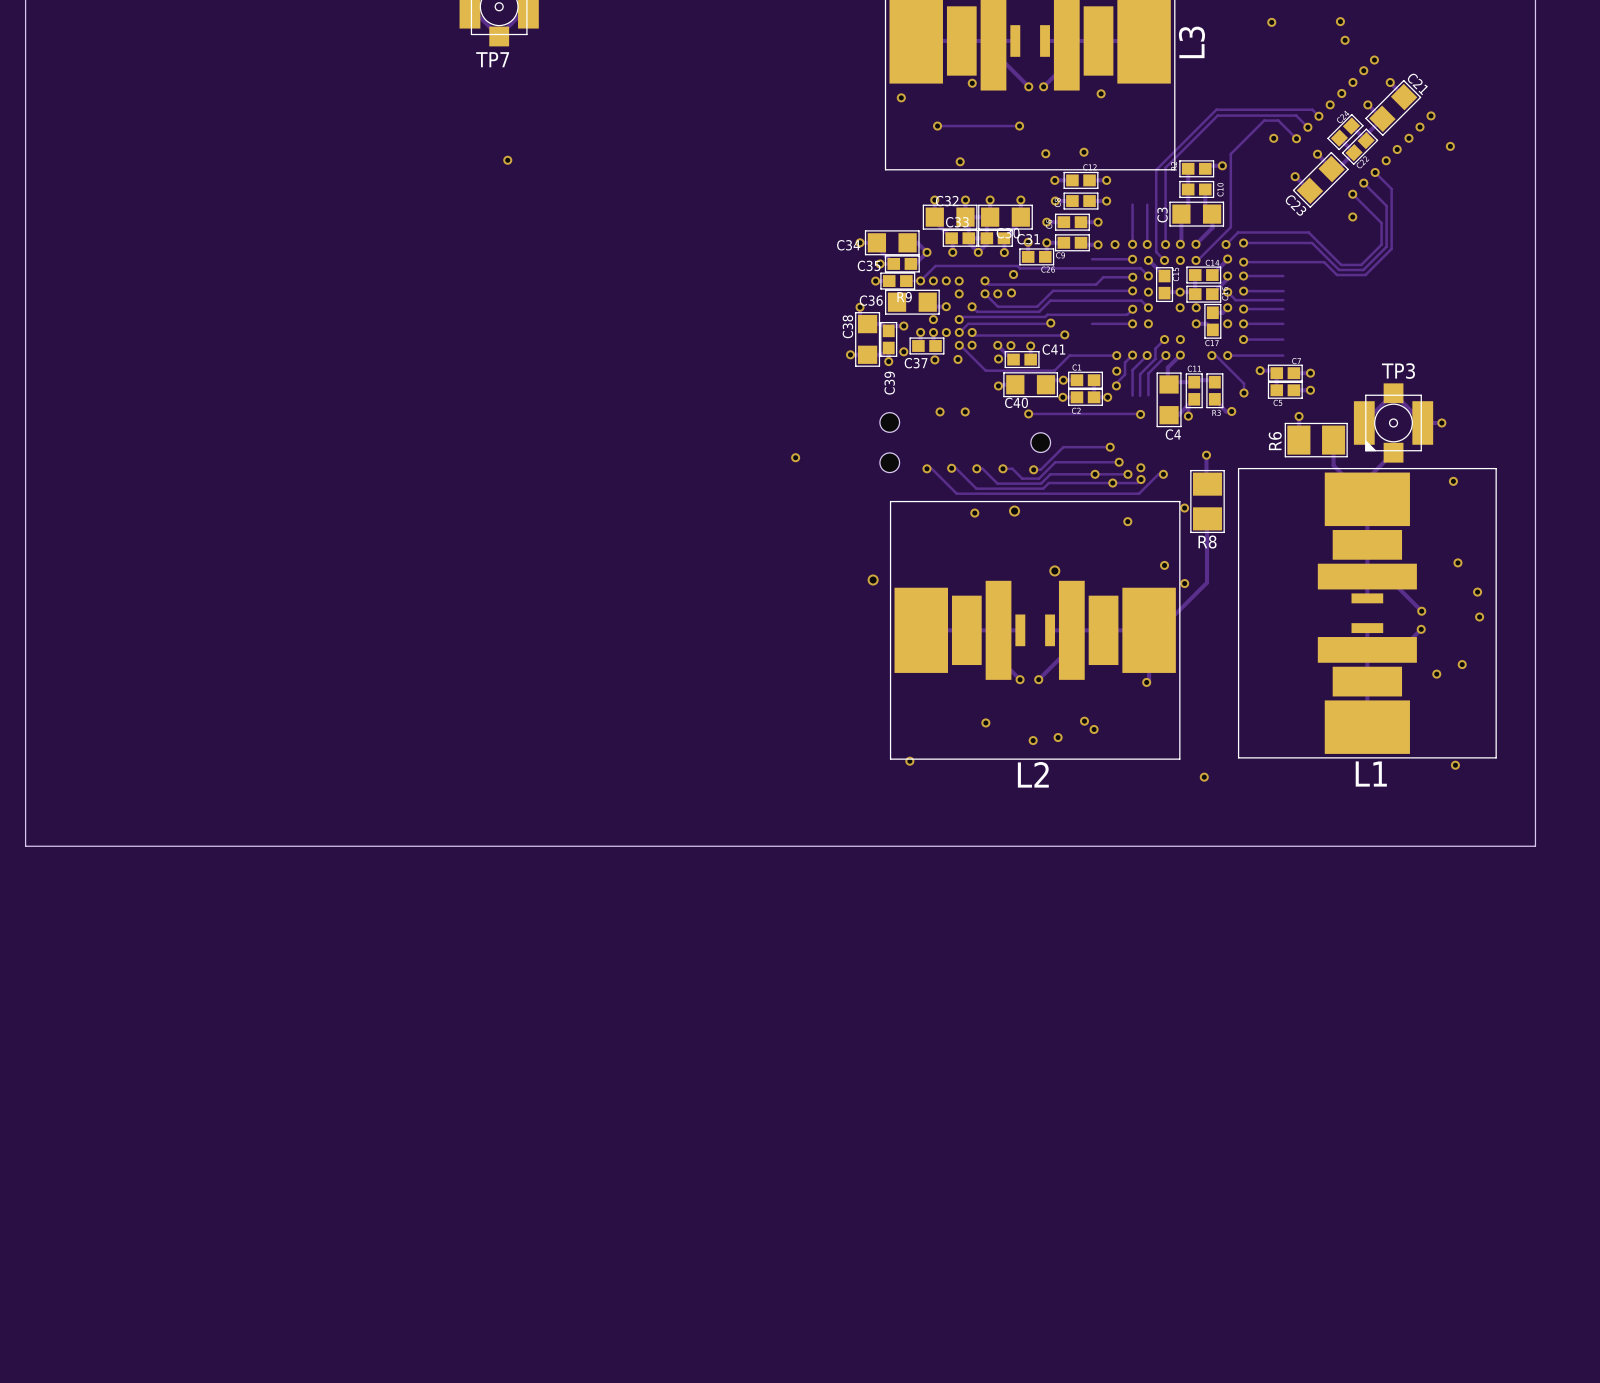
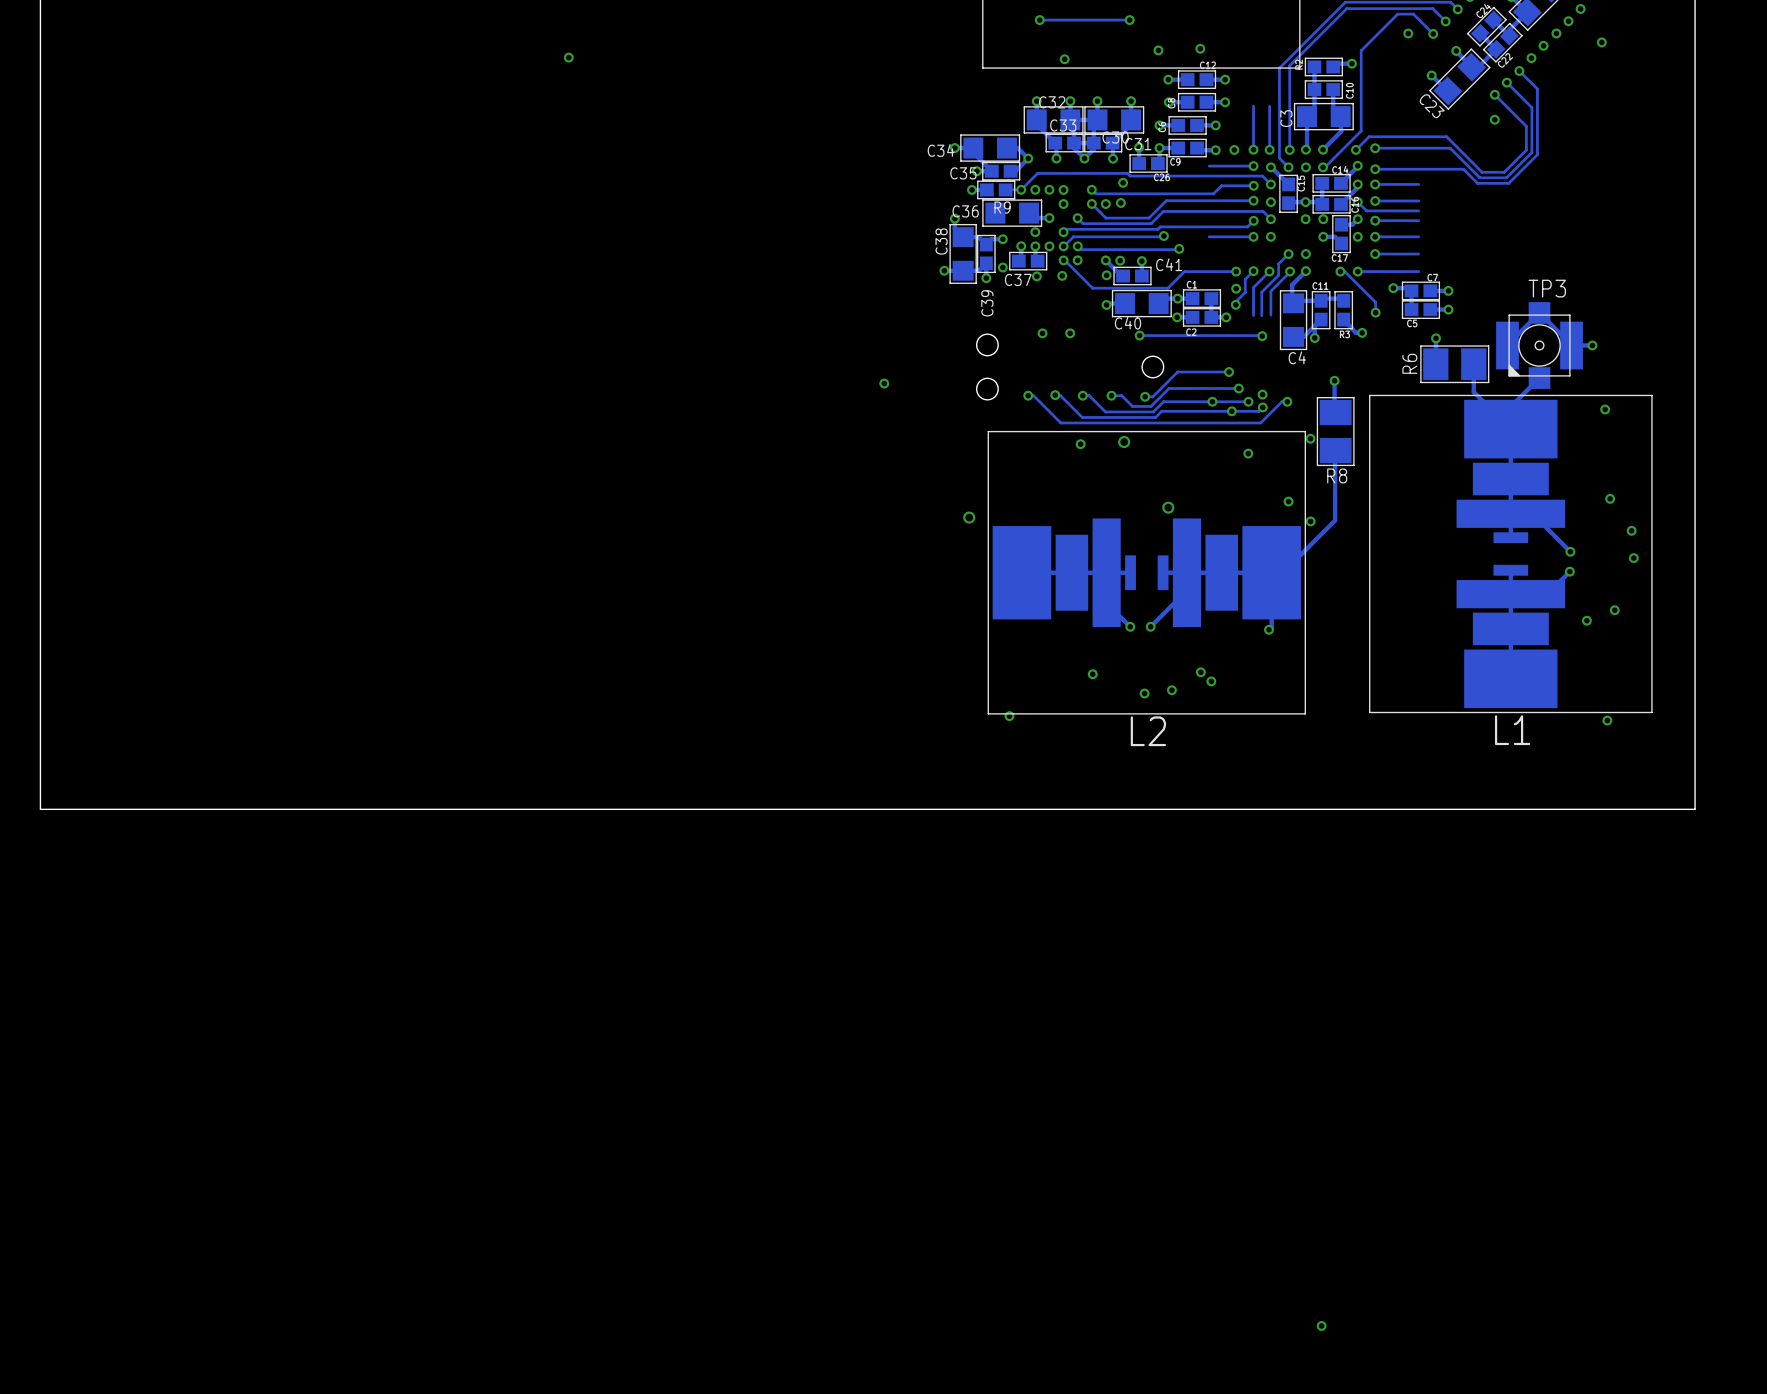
via: (1204, 777) -> none
via: none -> (1321, 1325)

